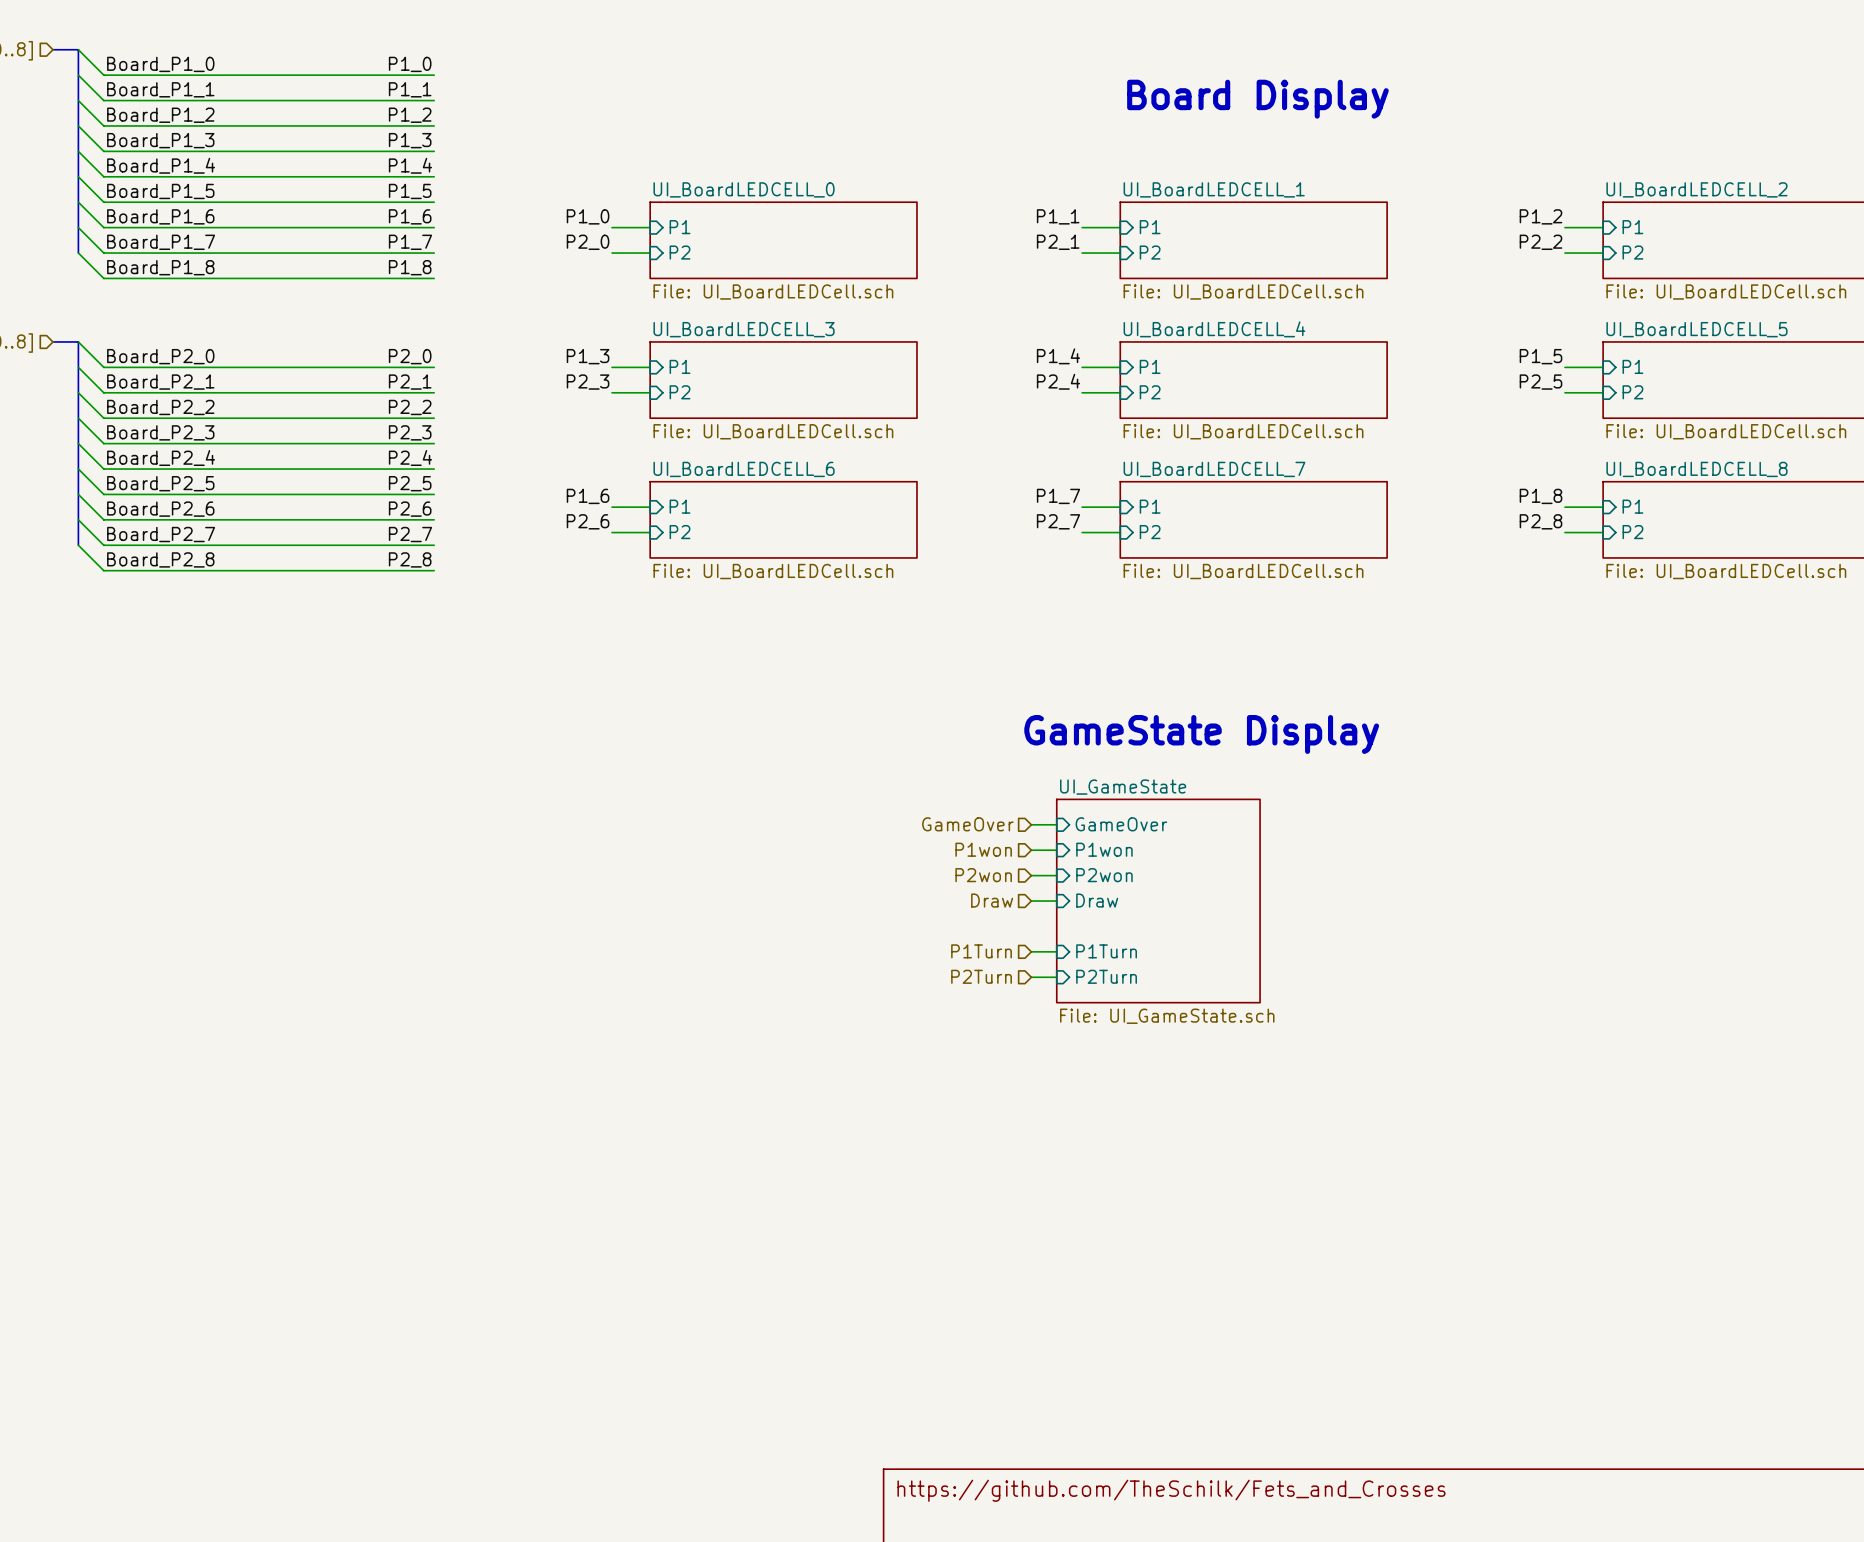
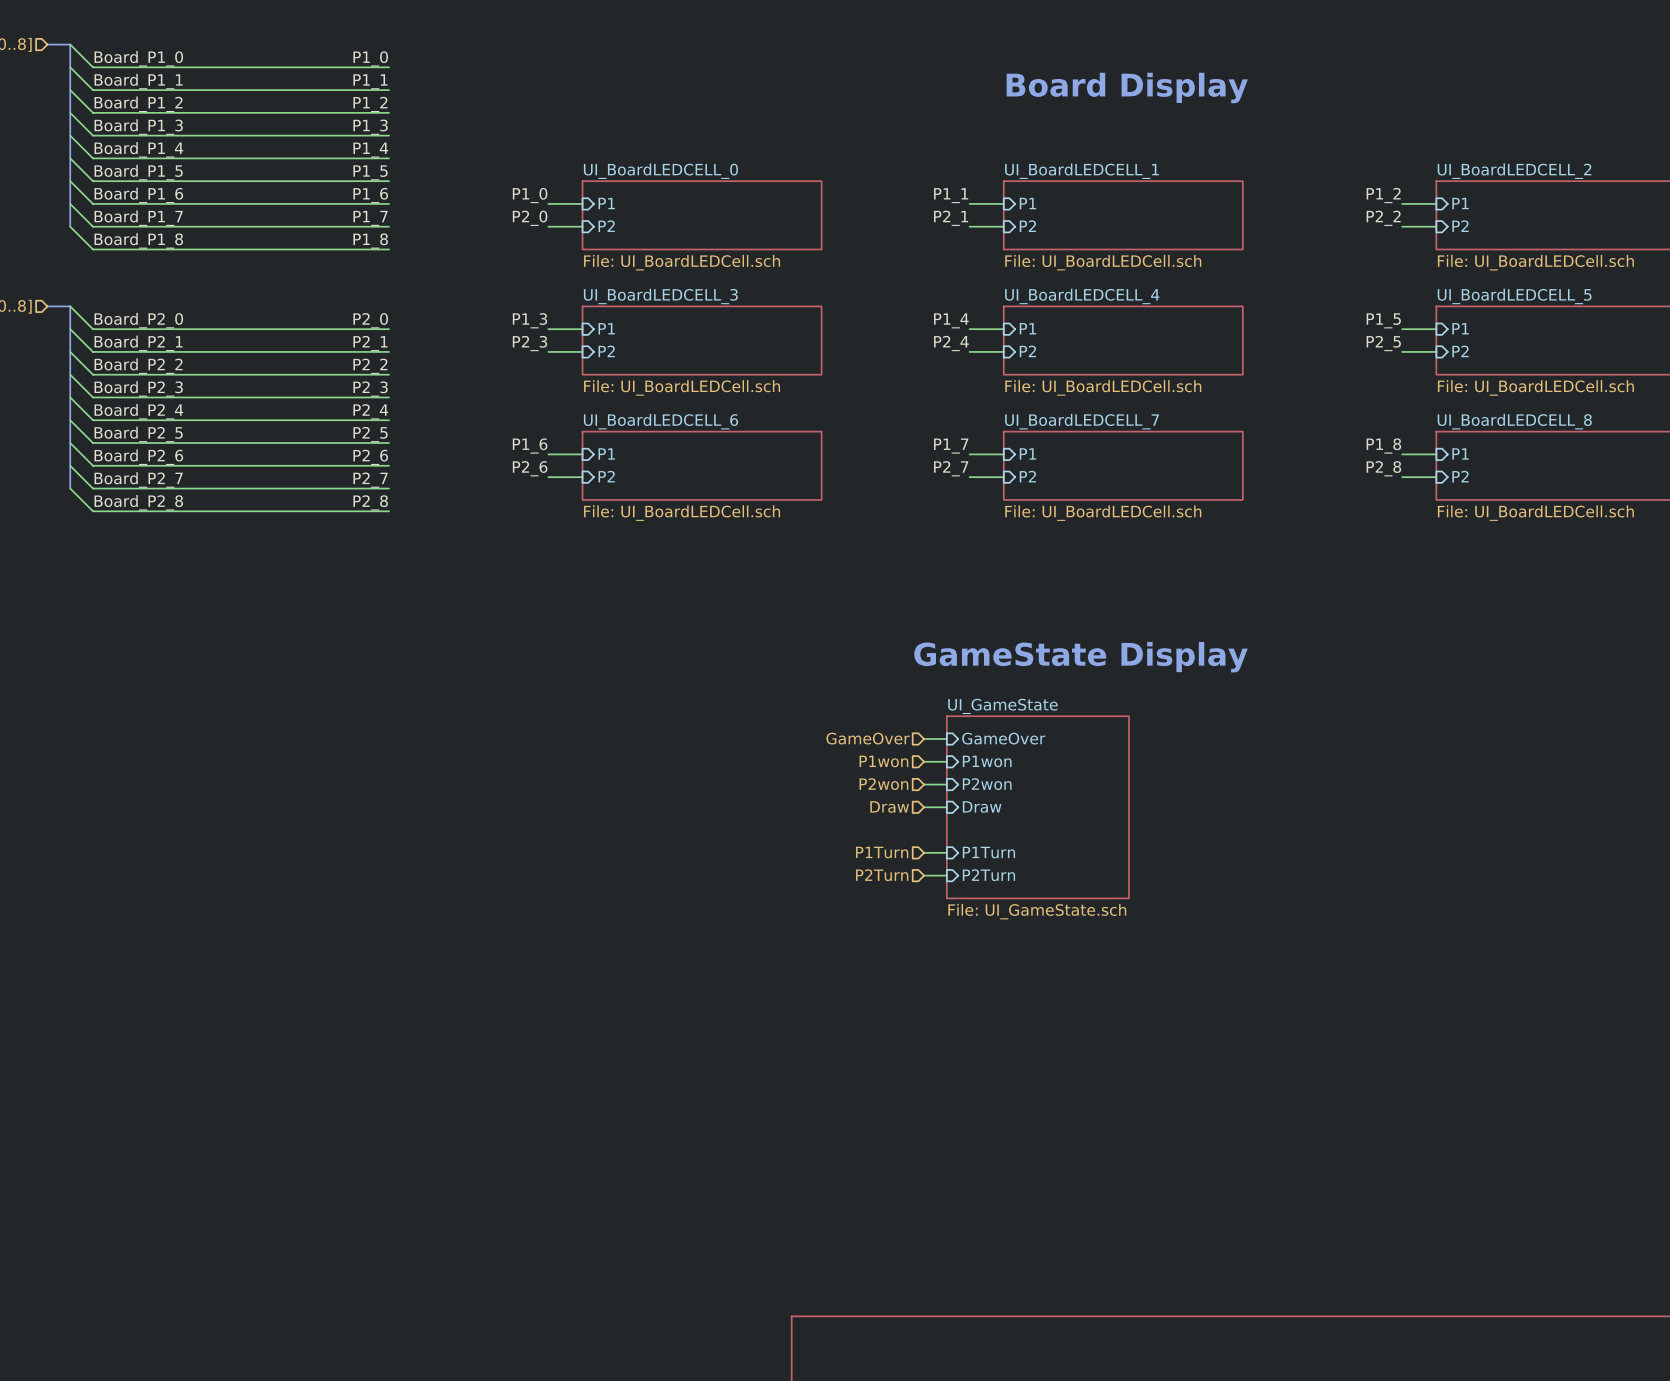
title block: https://github.com/TheSchilk/Fets_and_Crosses (1171, 1490) -> none

